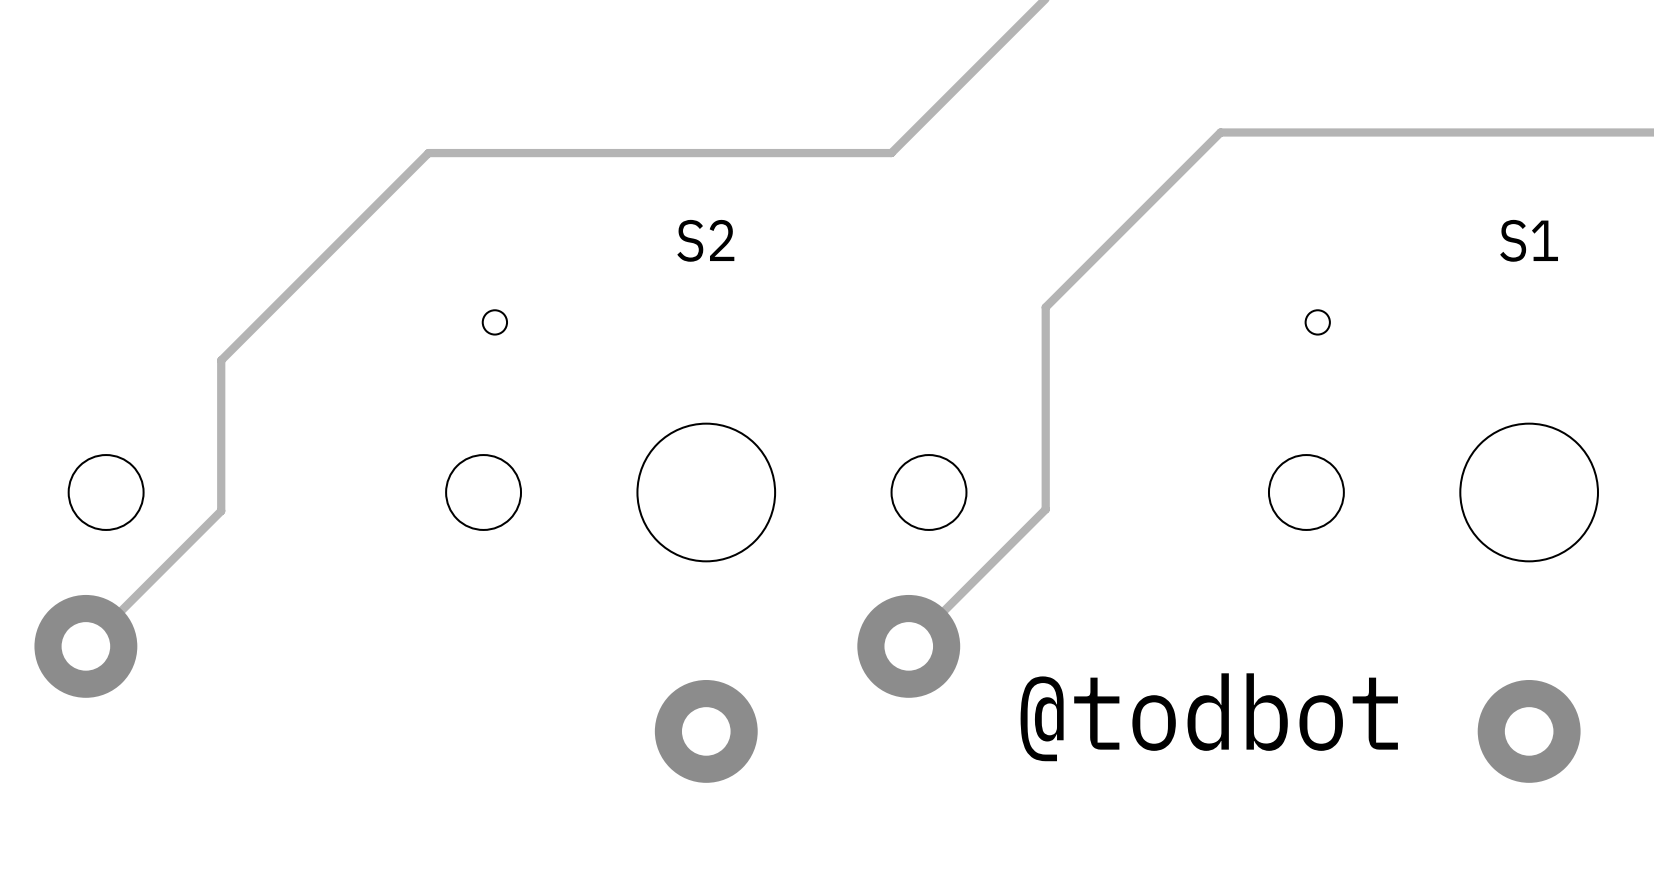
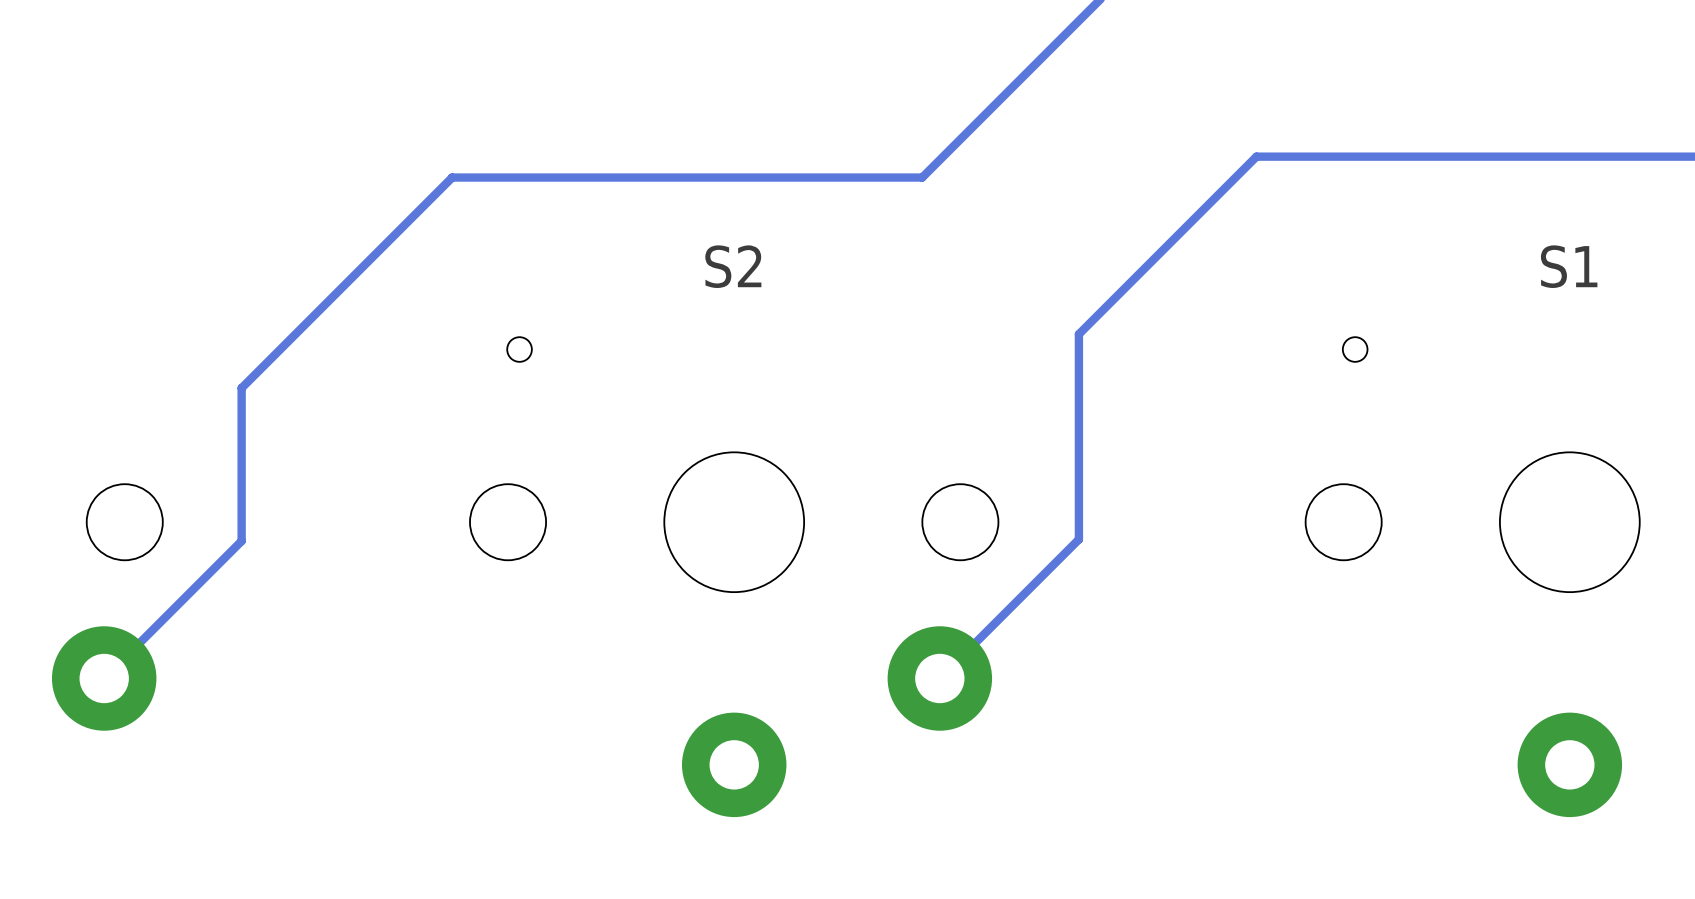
text: @todbot (1209, 717) -> none

